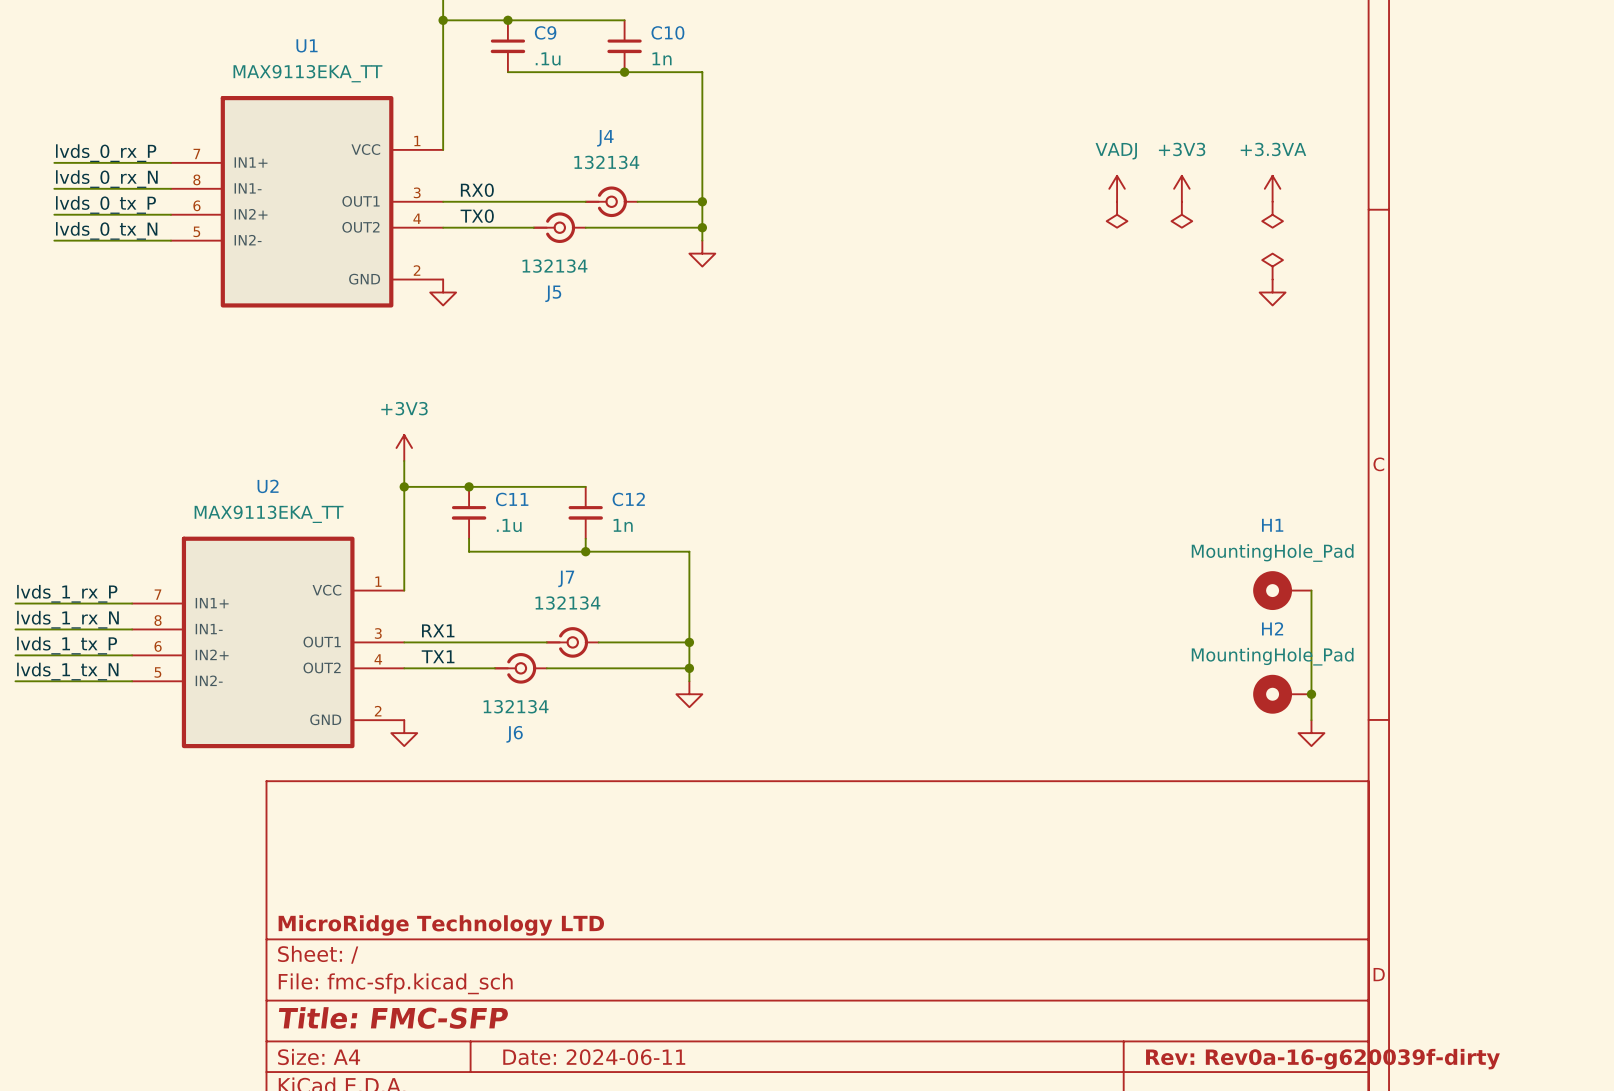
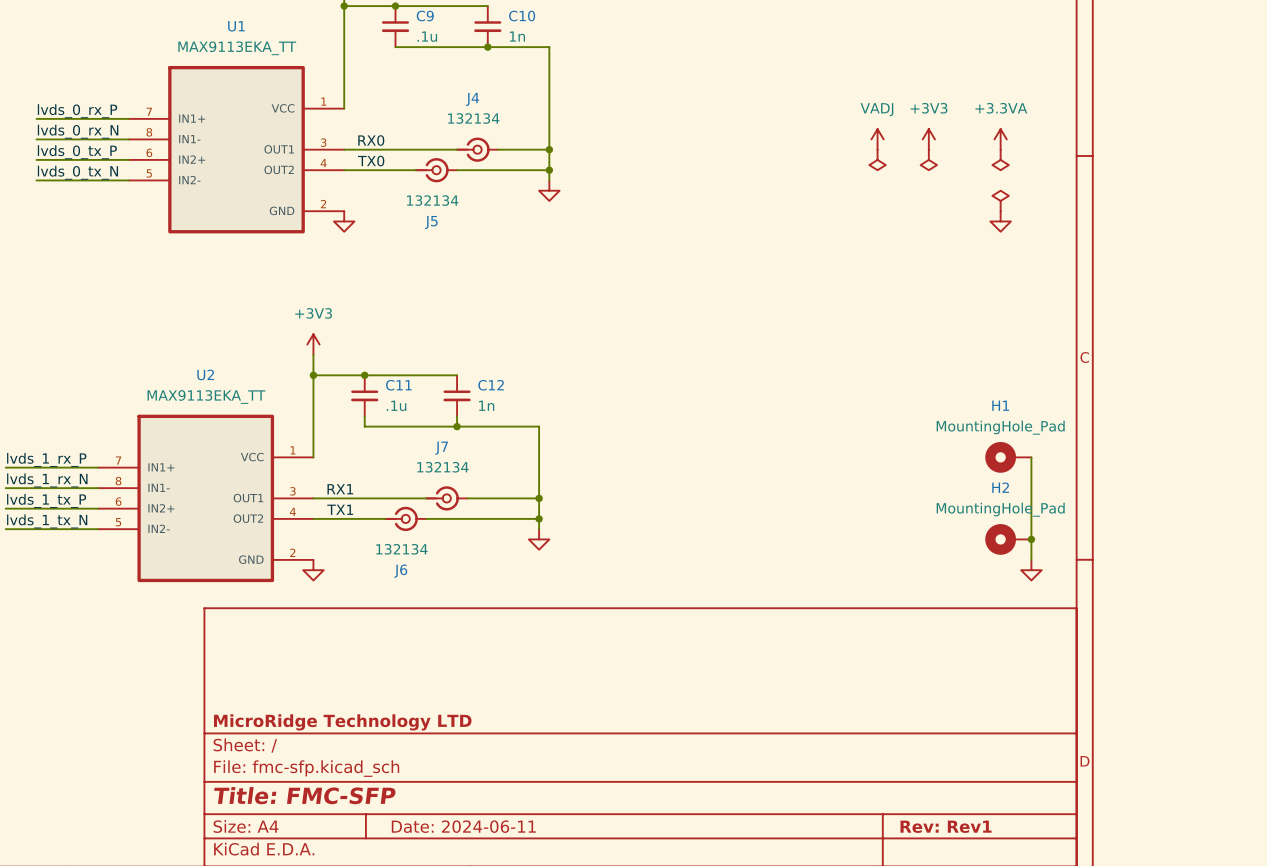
title block: Rev: Rev0a-16-g620039f-dirty (1322, 1059) -> Rev: Rev1 (946, 826)

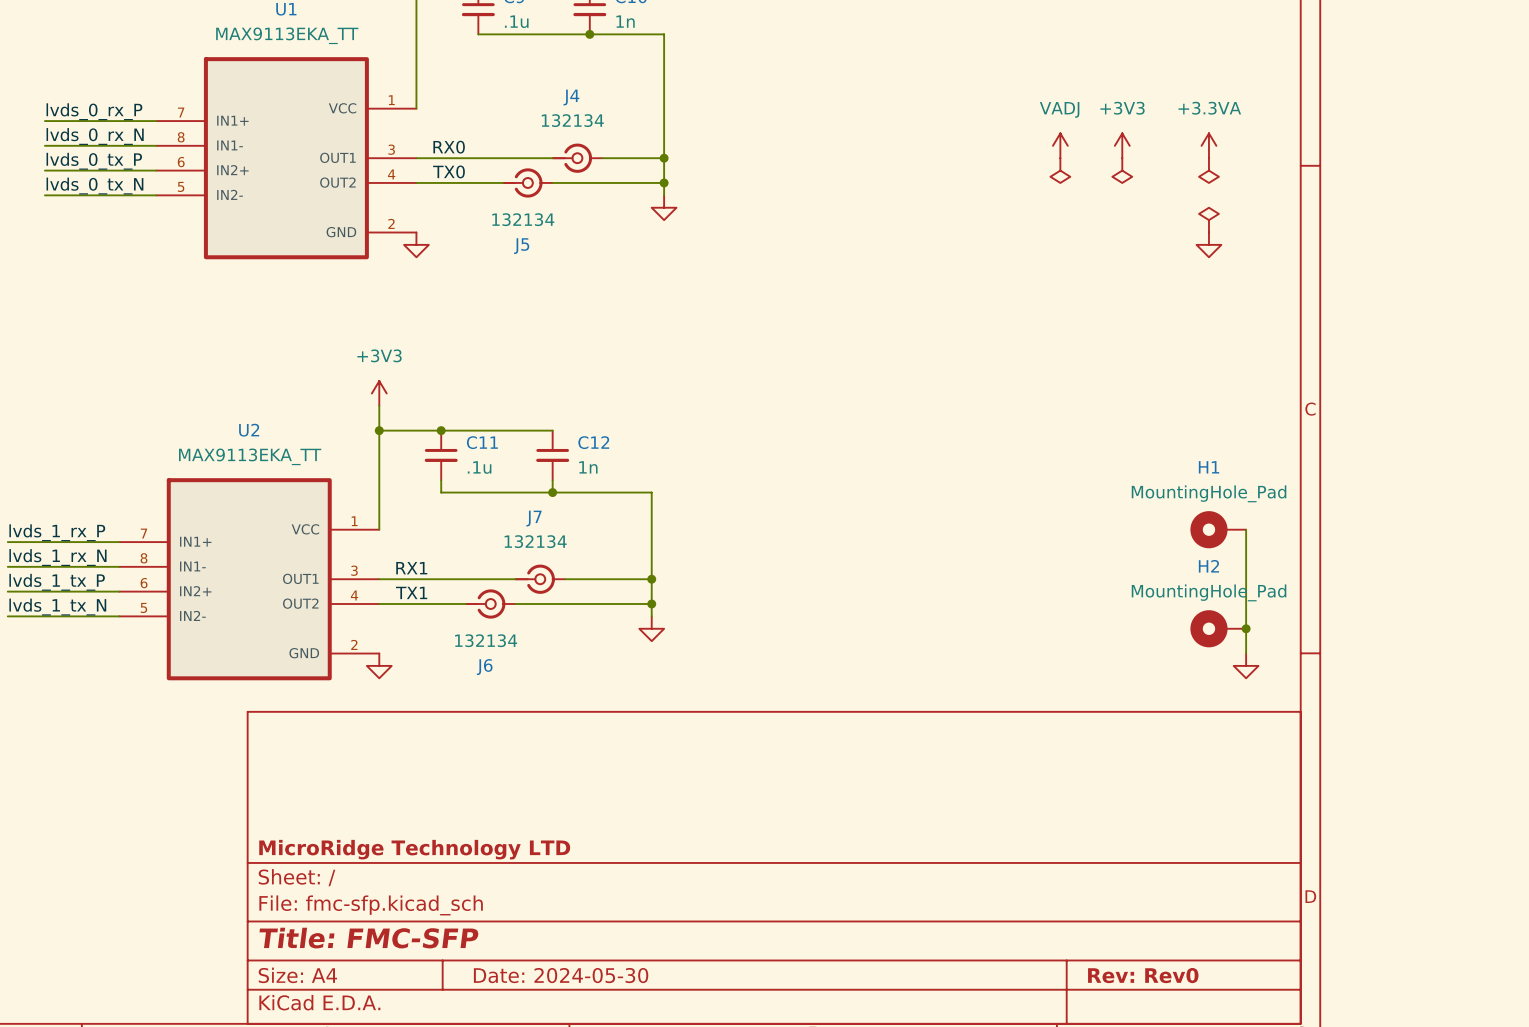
title block: Date: 2024-06-11 (463, 826) -> Date: 2024-05-30 (561, 975)
title block: Rev: Rev1 (946, 826) -> Rev: Rev0 (1143, 975)

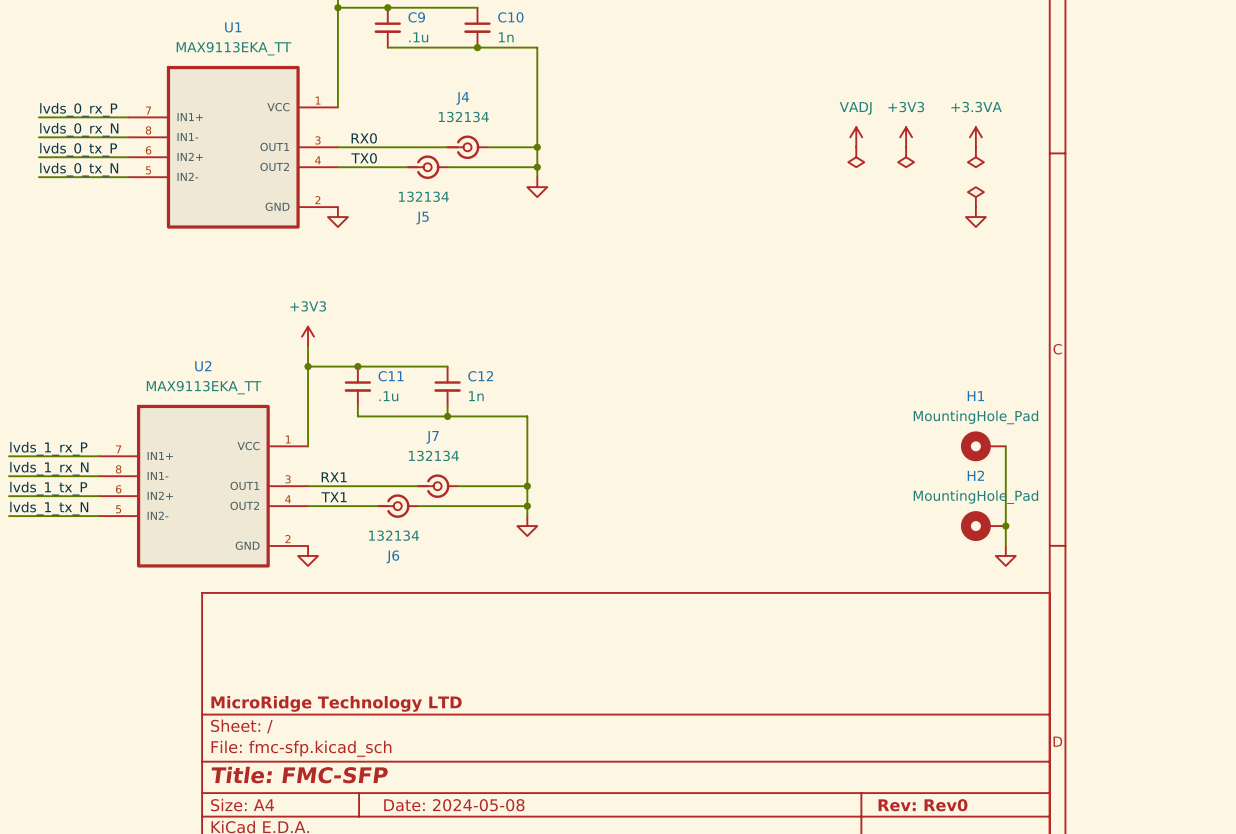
title block: Date: 2024-05-30 (561, 975) -> Date: 2024-05-08 (454, 805)

